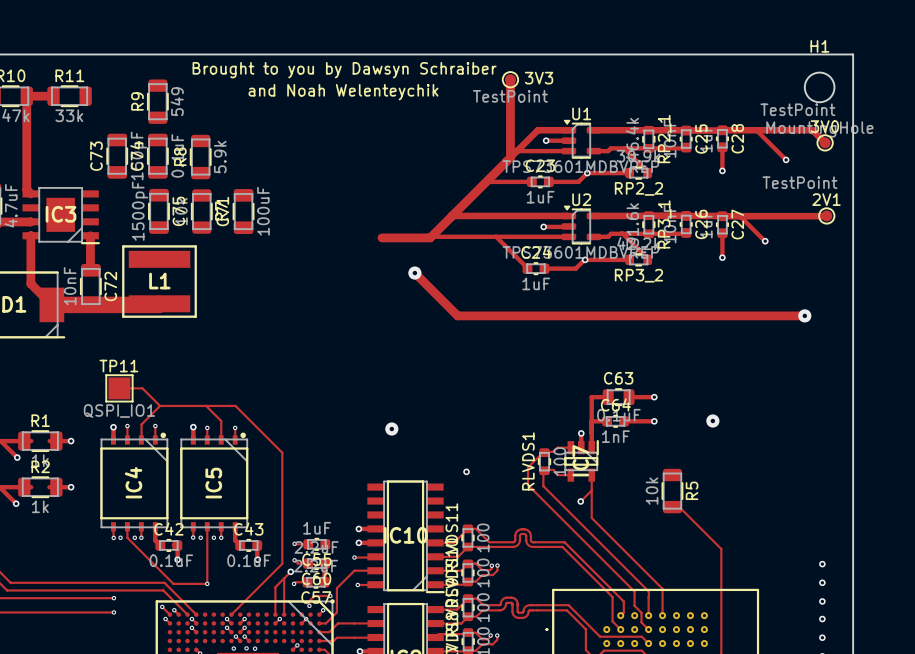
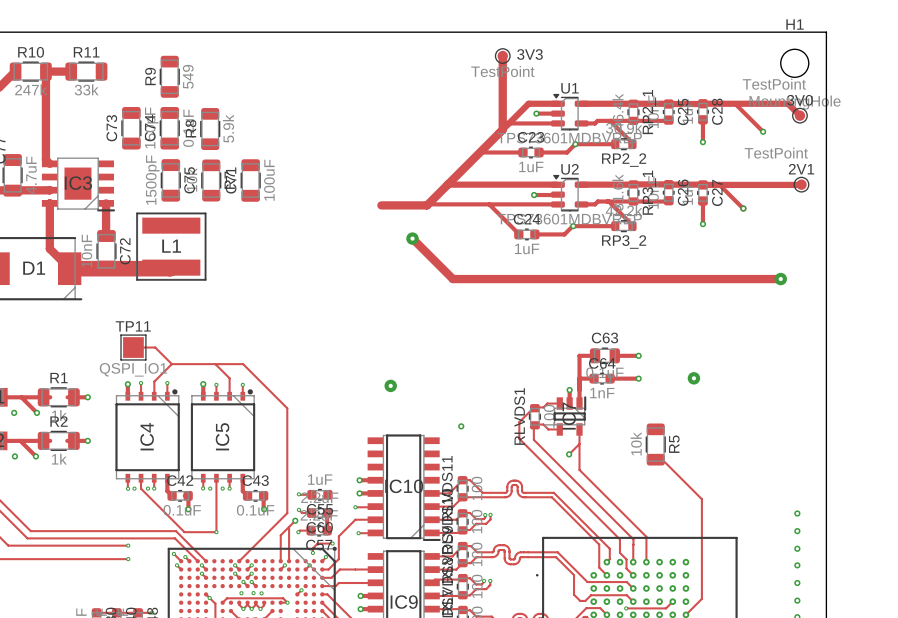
text: Brought to you by Dawsyn Schraiber (344, 70) -> none
text: and Noah Welenteychik (343, 92) -> none

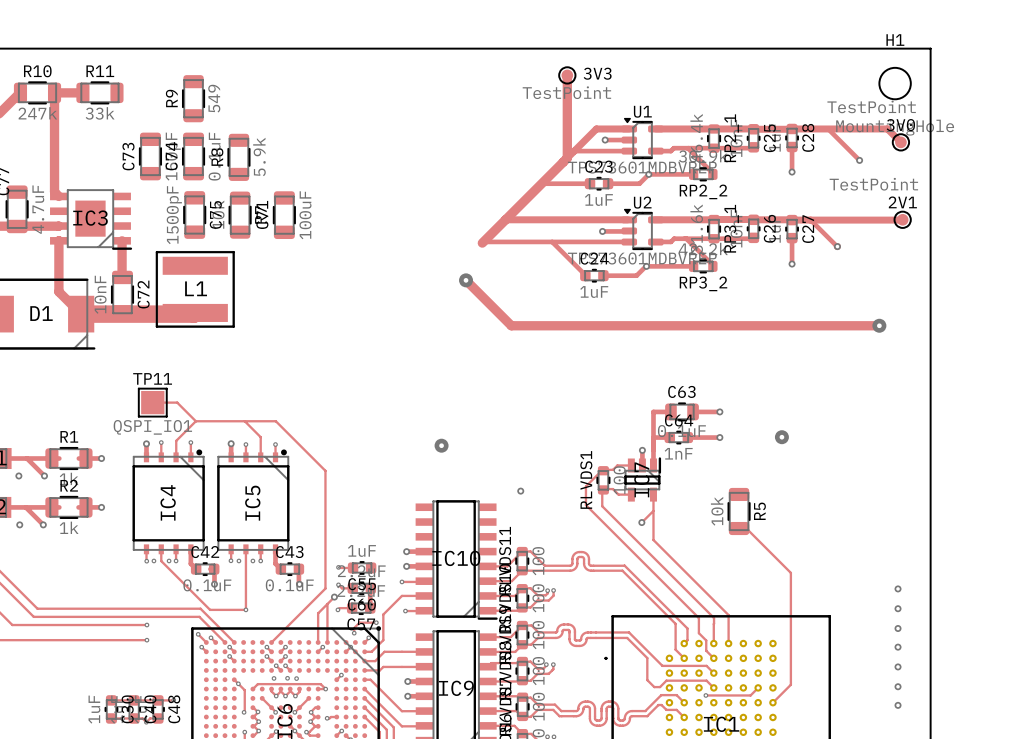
track: (381, 205) (427, 205) -> none

